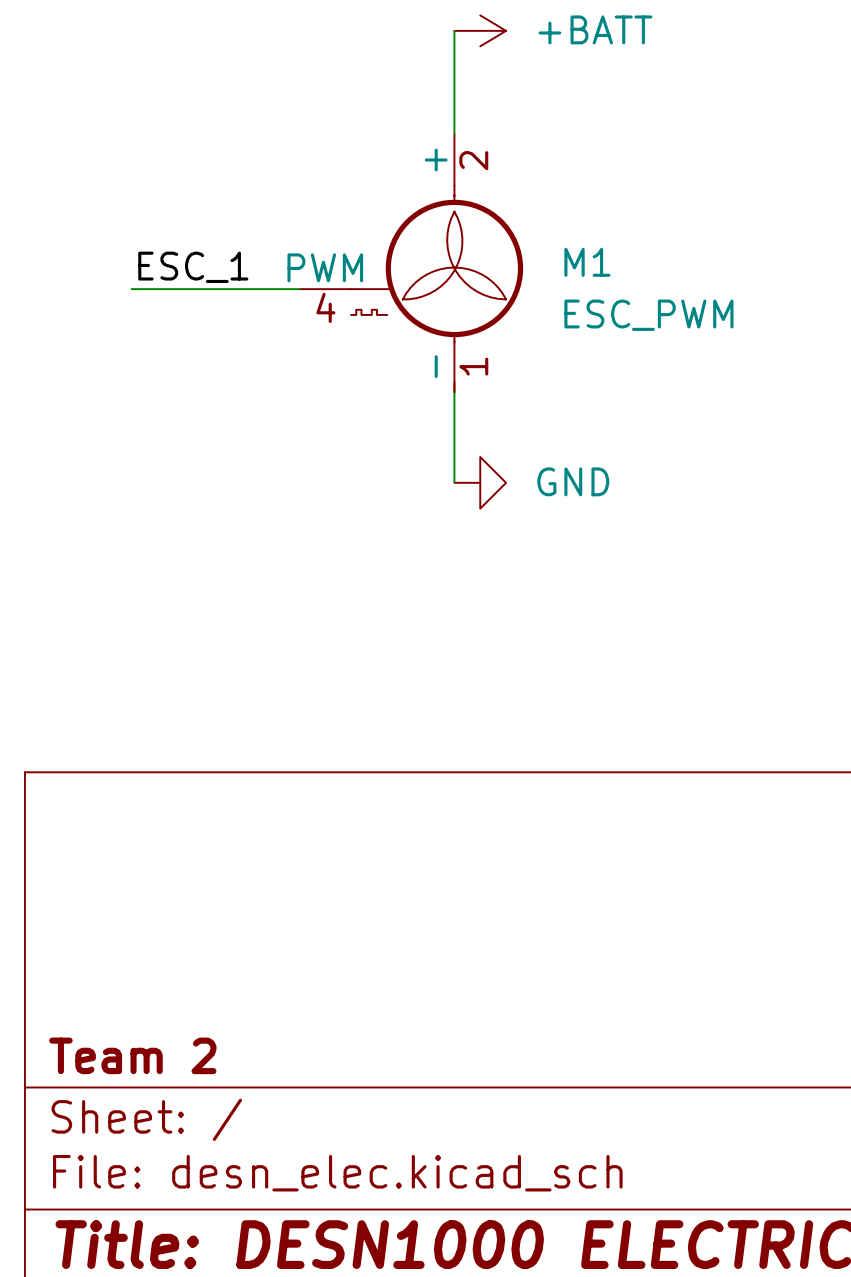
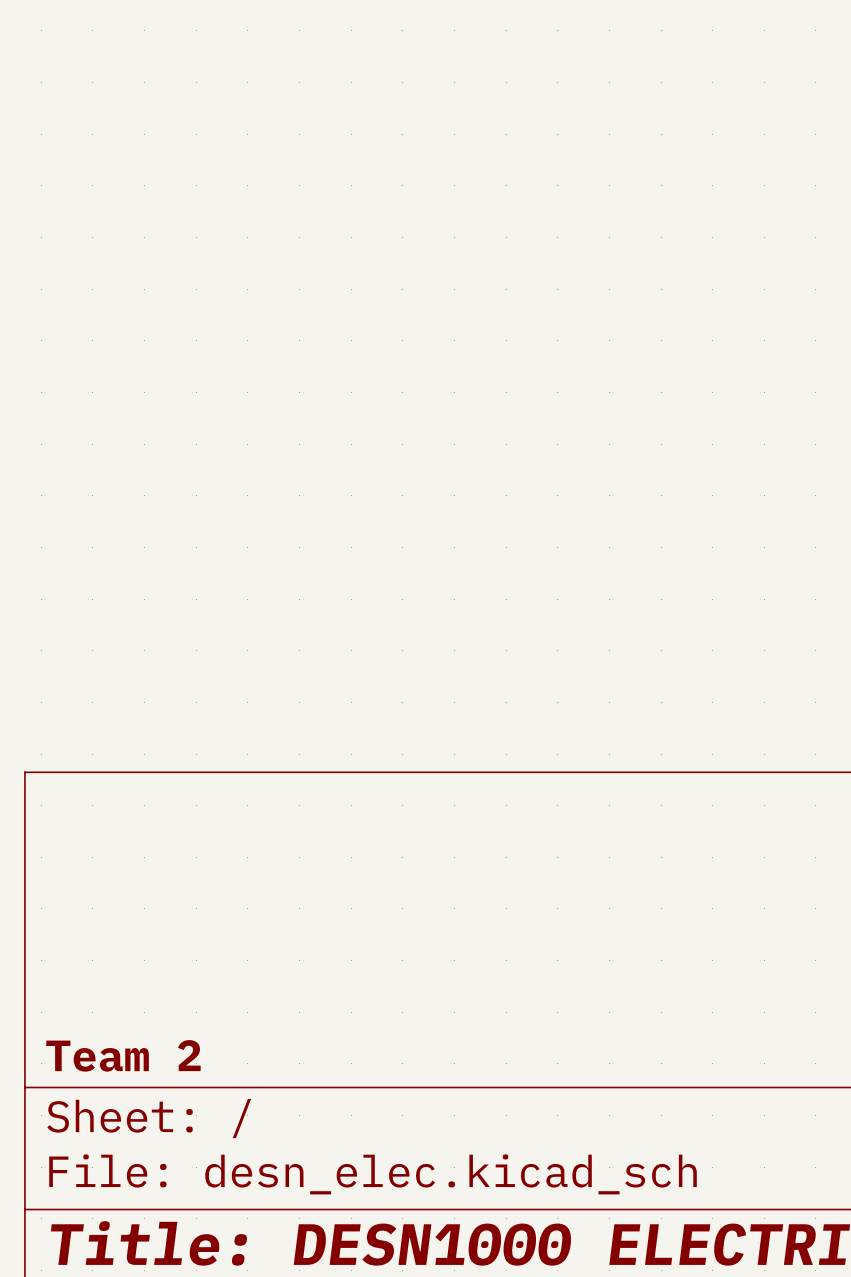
wire: (454, 30) (454, 134) -> none
power symbol: +BATT (480, 30) -> none
M1: ESC_PWM (411, 263) -> none
label: ESC_1 (193, 267) -> none
wire: (131, 289) (299, 289) -> none
wire: (454, 392) (454, 482) -> none
power symbol: GND (480, 482) -> none

